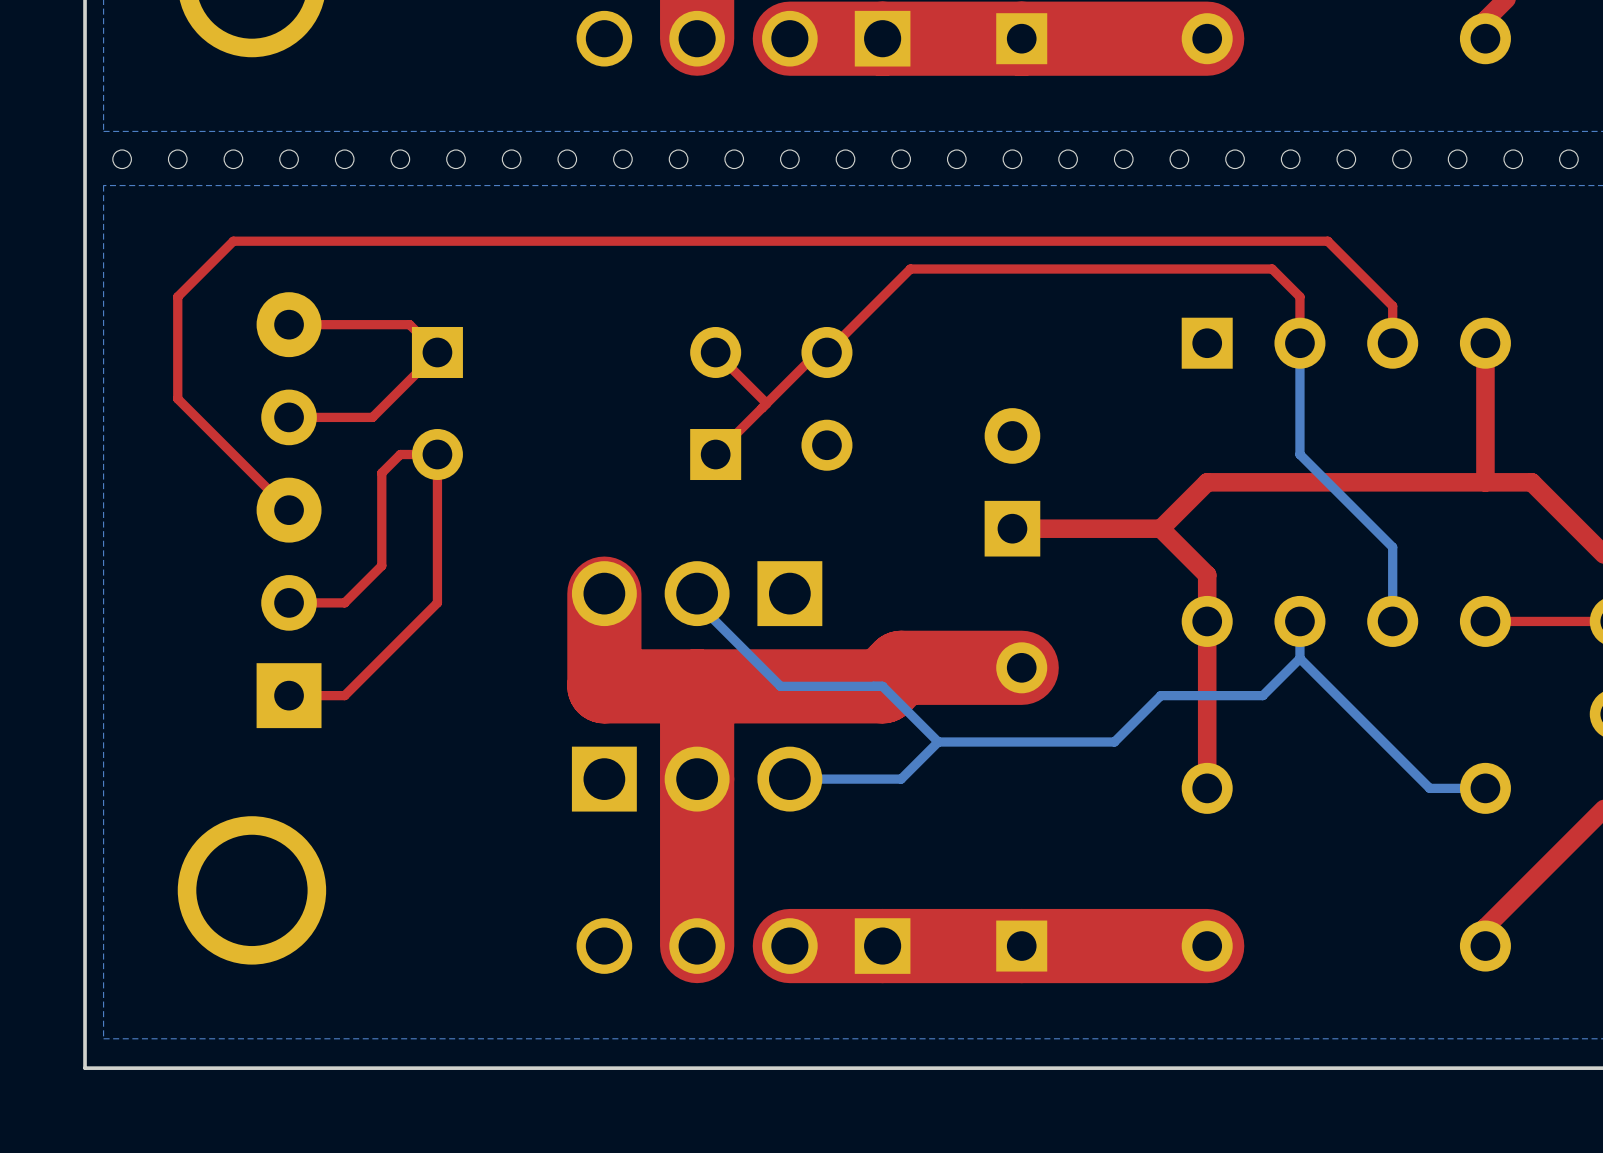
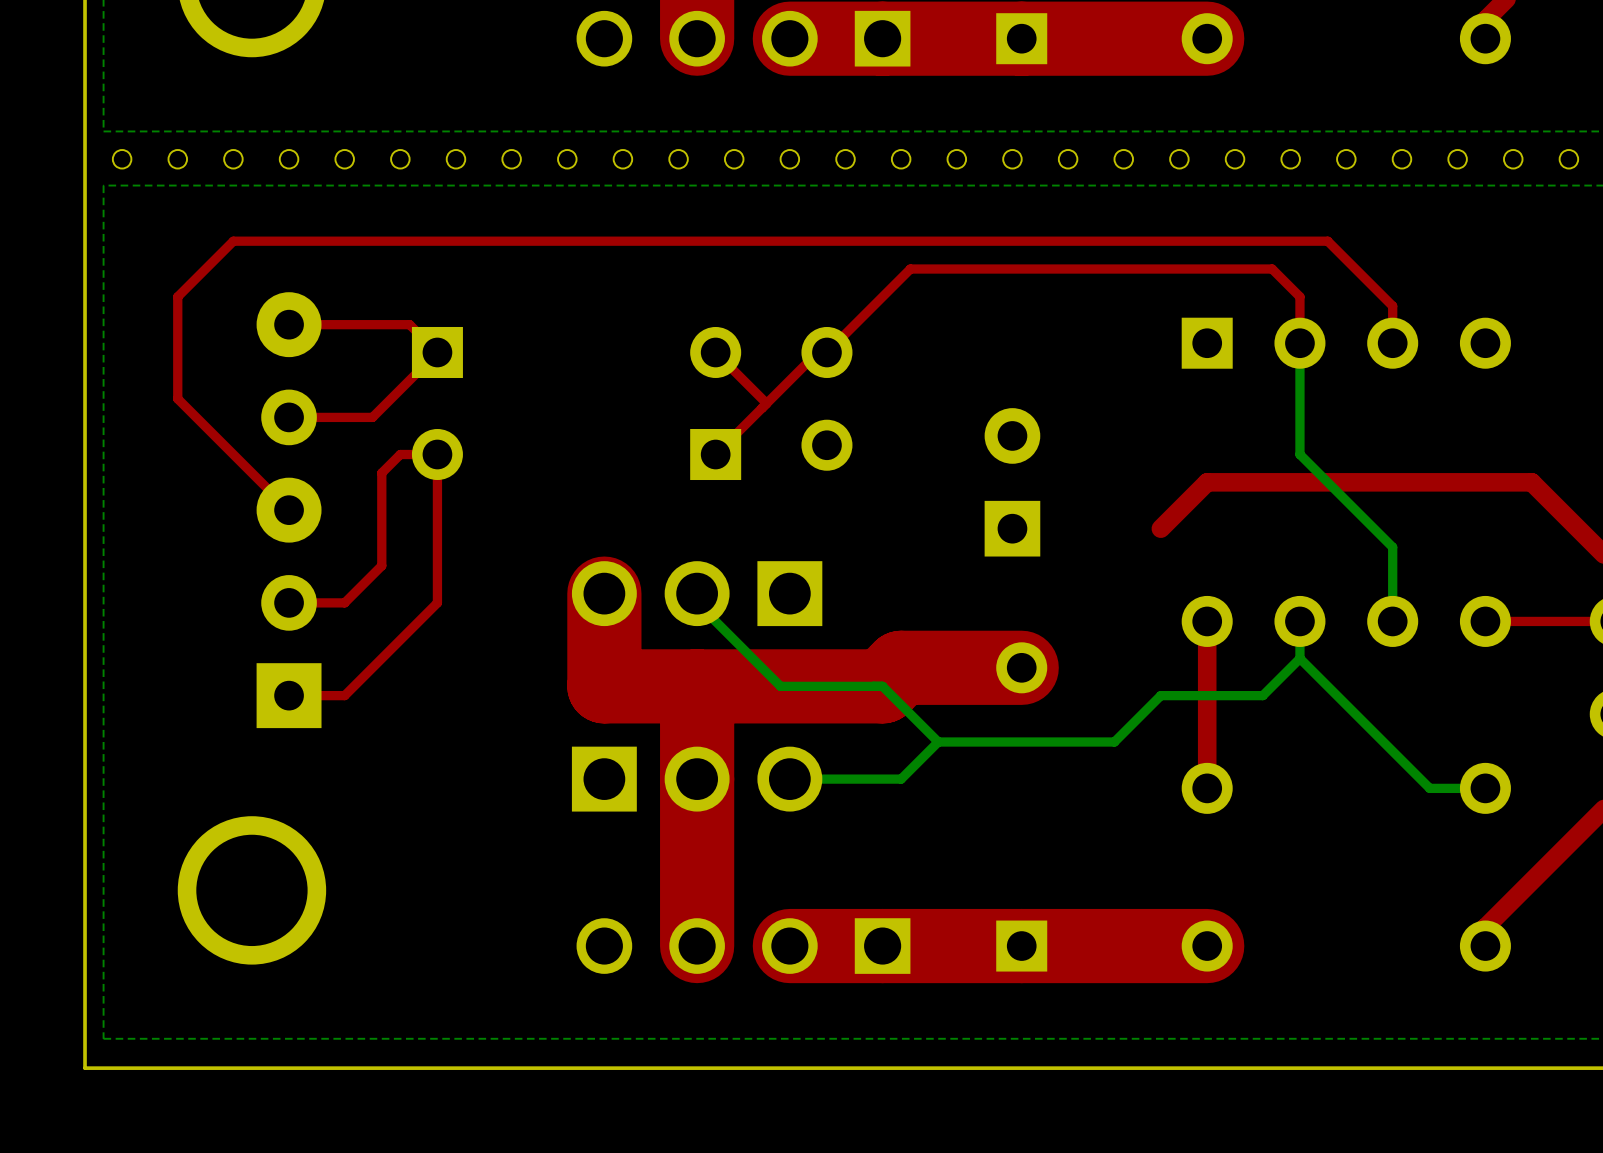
top track: (1485, 343) (1485, 482) -> none
top track: (1012, 528) (1160, 528) (1207, 575) (1207, 612) -> none

